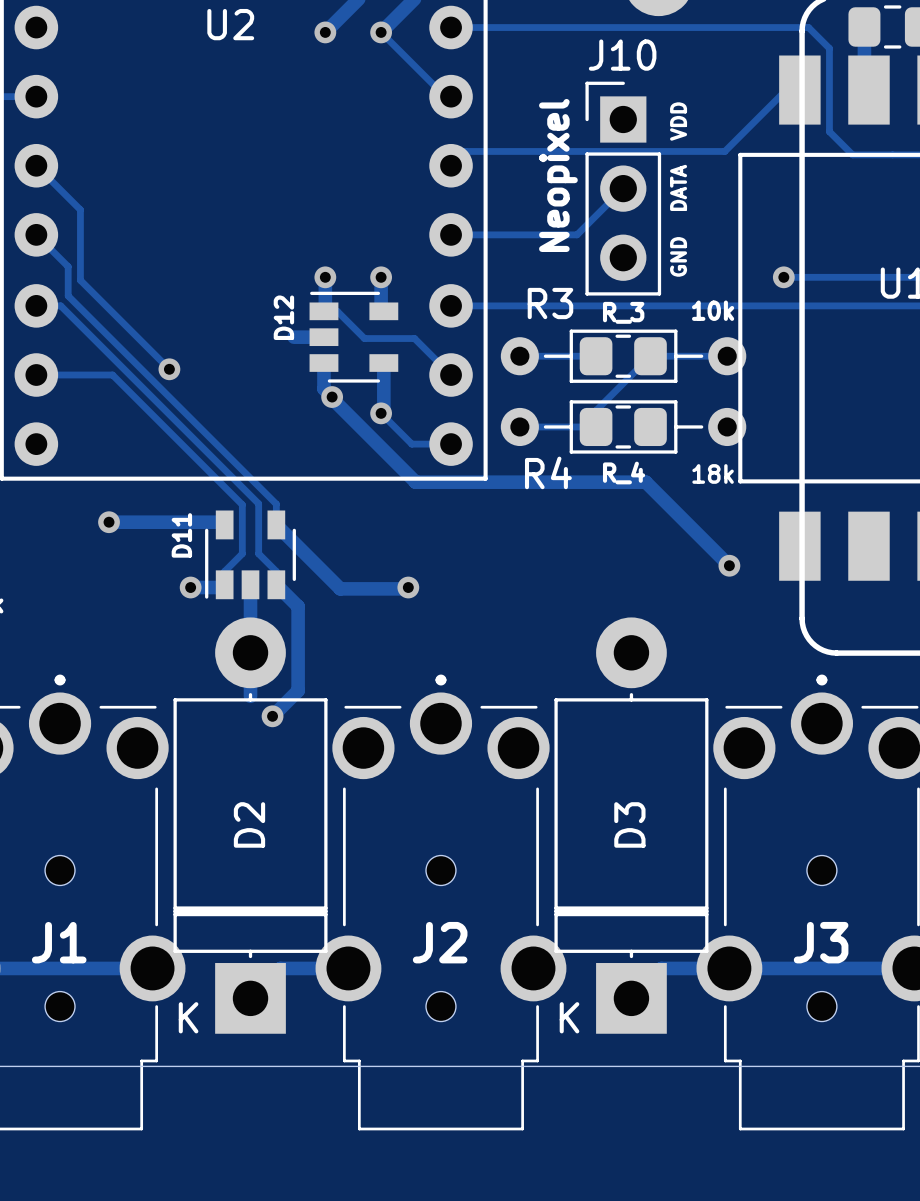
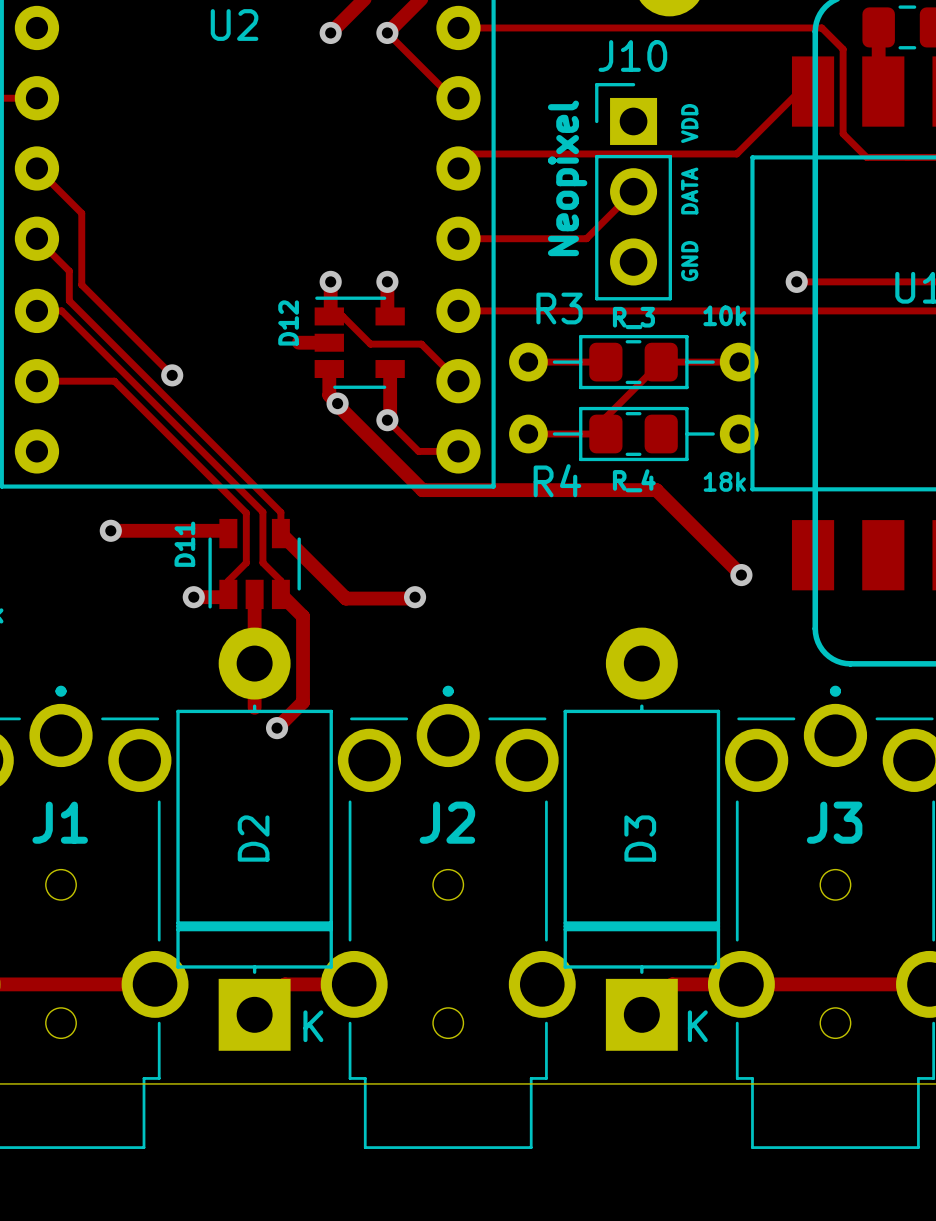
J1 name position: J1 (59, 942) -> J1 (60, 822)
J2 name position: J2 (440, 942) -> J2 (447, 822)
J3 name position: J3 (821, 942) -> J3 (834, 822)
D2 text position: K (188, 1017) -> K (313, 1026)
D3 text position: K (569, 1017) -> K (697, 1026)

